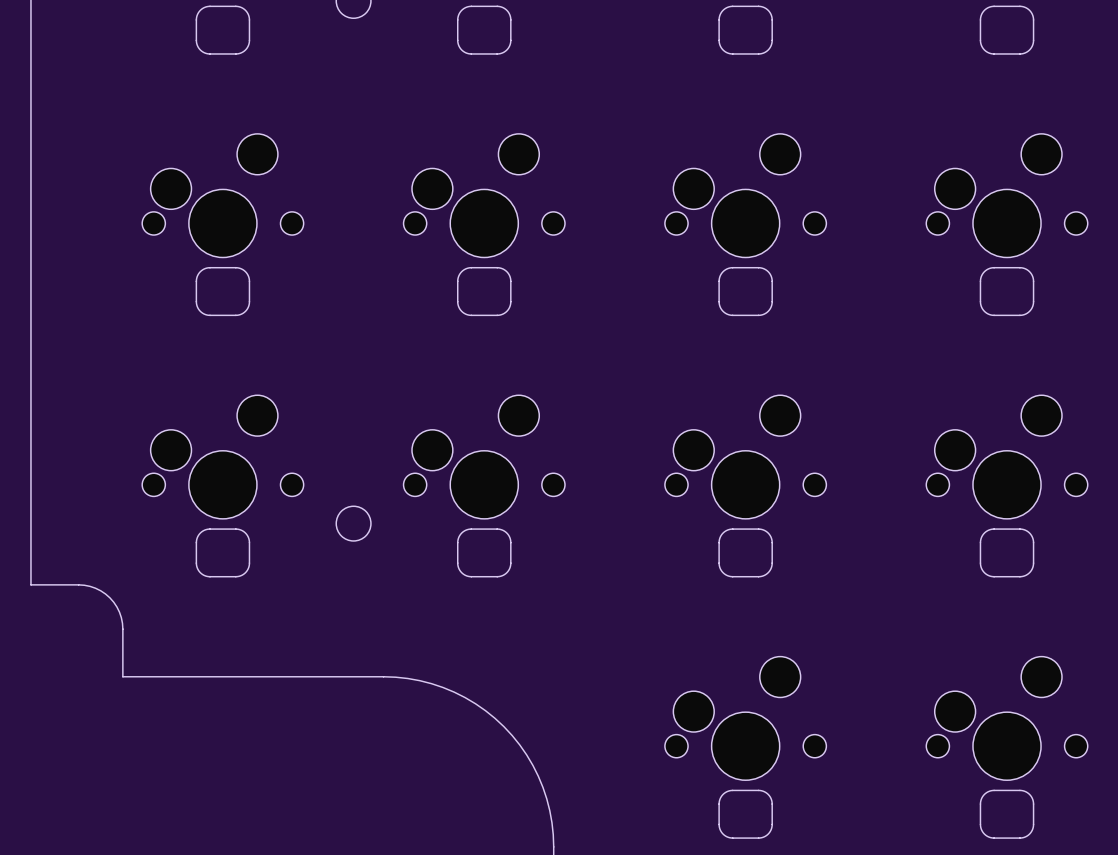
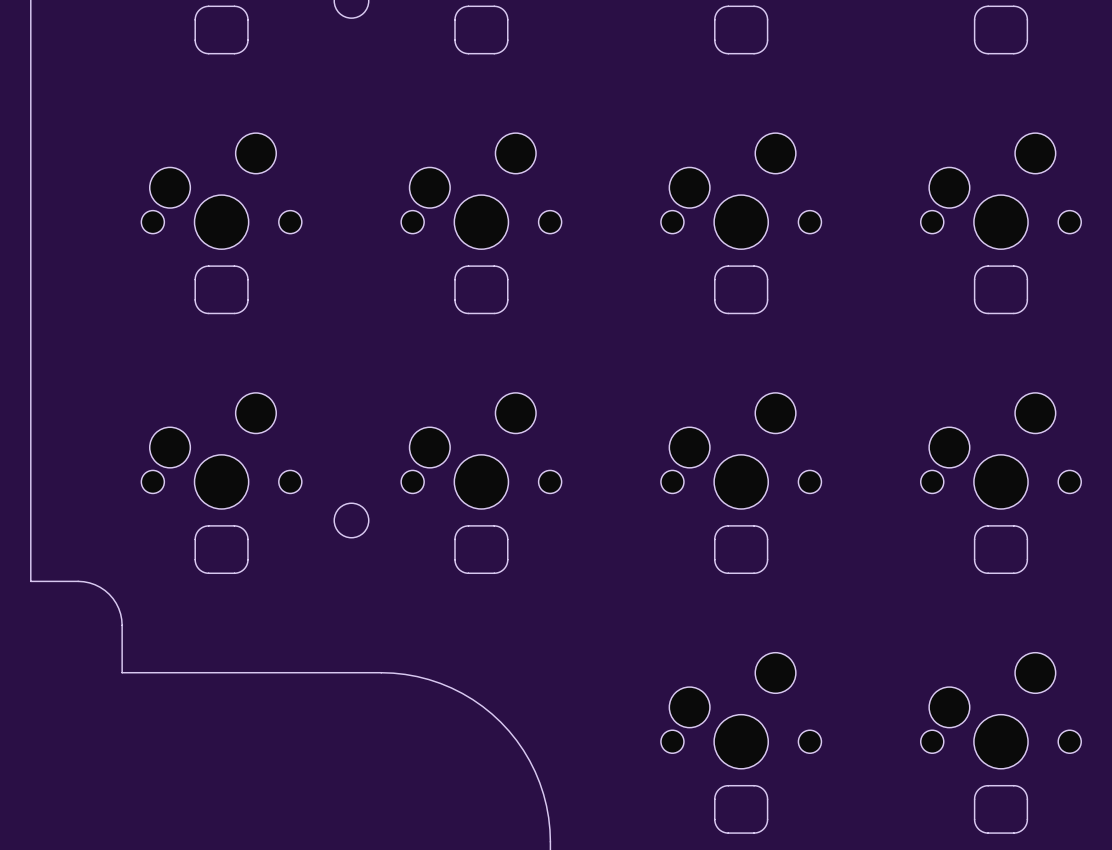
part footprint: [142, 133, 304, 258] -> [141, 133, 302, 250]
part footprint: [403, 133, 566, 258] -> [401, 133, 562, 250]
part footprint: [664, 133, 827, 258] -> [660, 133, 822, 250]
part footprint: [926, 133, 1088, 258] -> [920, 133, 1082, 250]
part footprint: [142, 395, 304, 519] -> [141, 392, 302, 509]
part footprint: [403, 395, 566, 519] -> [401, 392, 562, 509]
part footprint: [664, 395, 827, 519] -> [660, 392, 822, 509]
part footprint: [926, 395, 1088, 519] -> [920, 392, 1082, 509]
part footprint: [664, 656, 827, 781] -> [660, 652, 822, 769]
part footprint: [926, 656, 1088, 781] -> [920, 652, 1082, 769]

